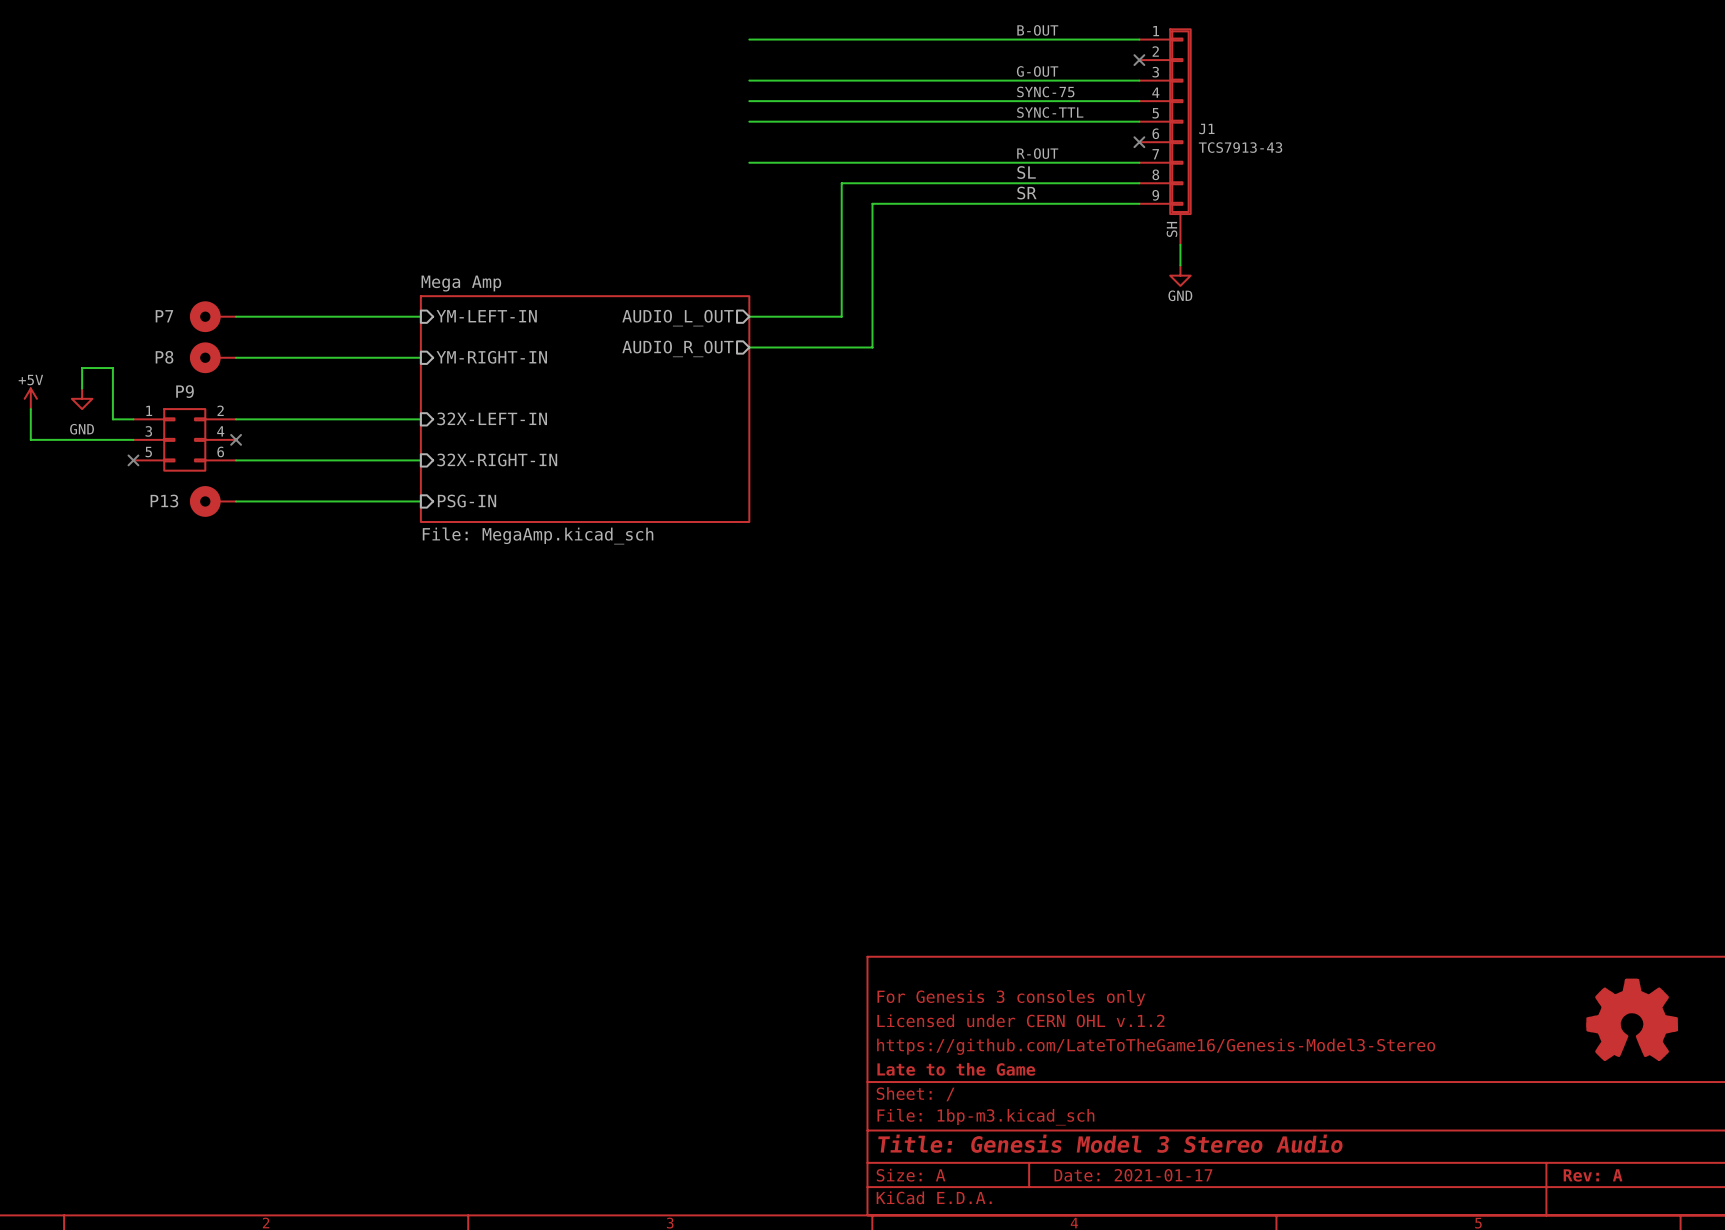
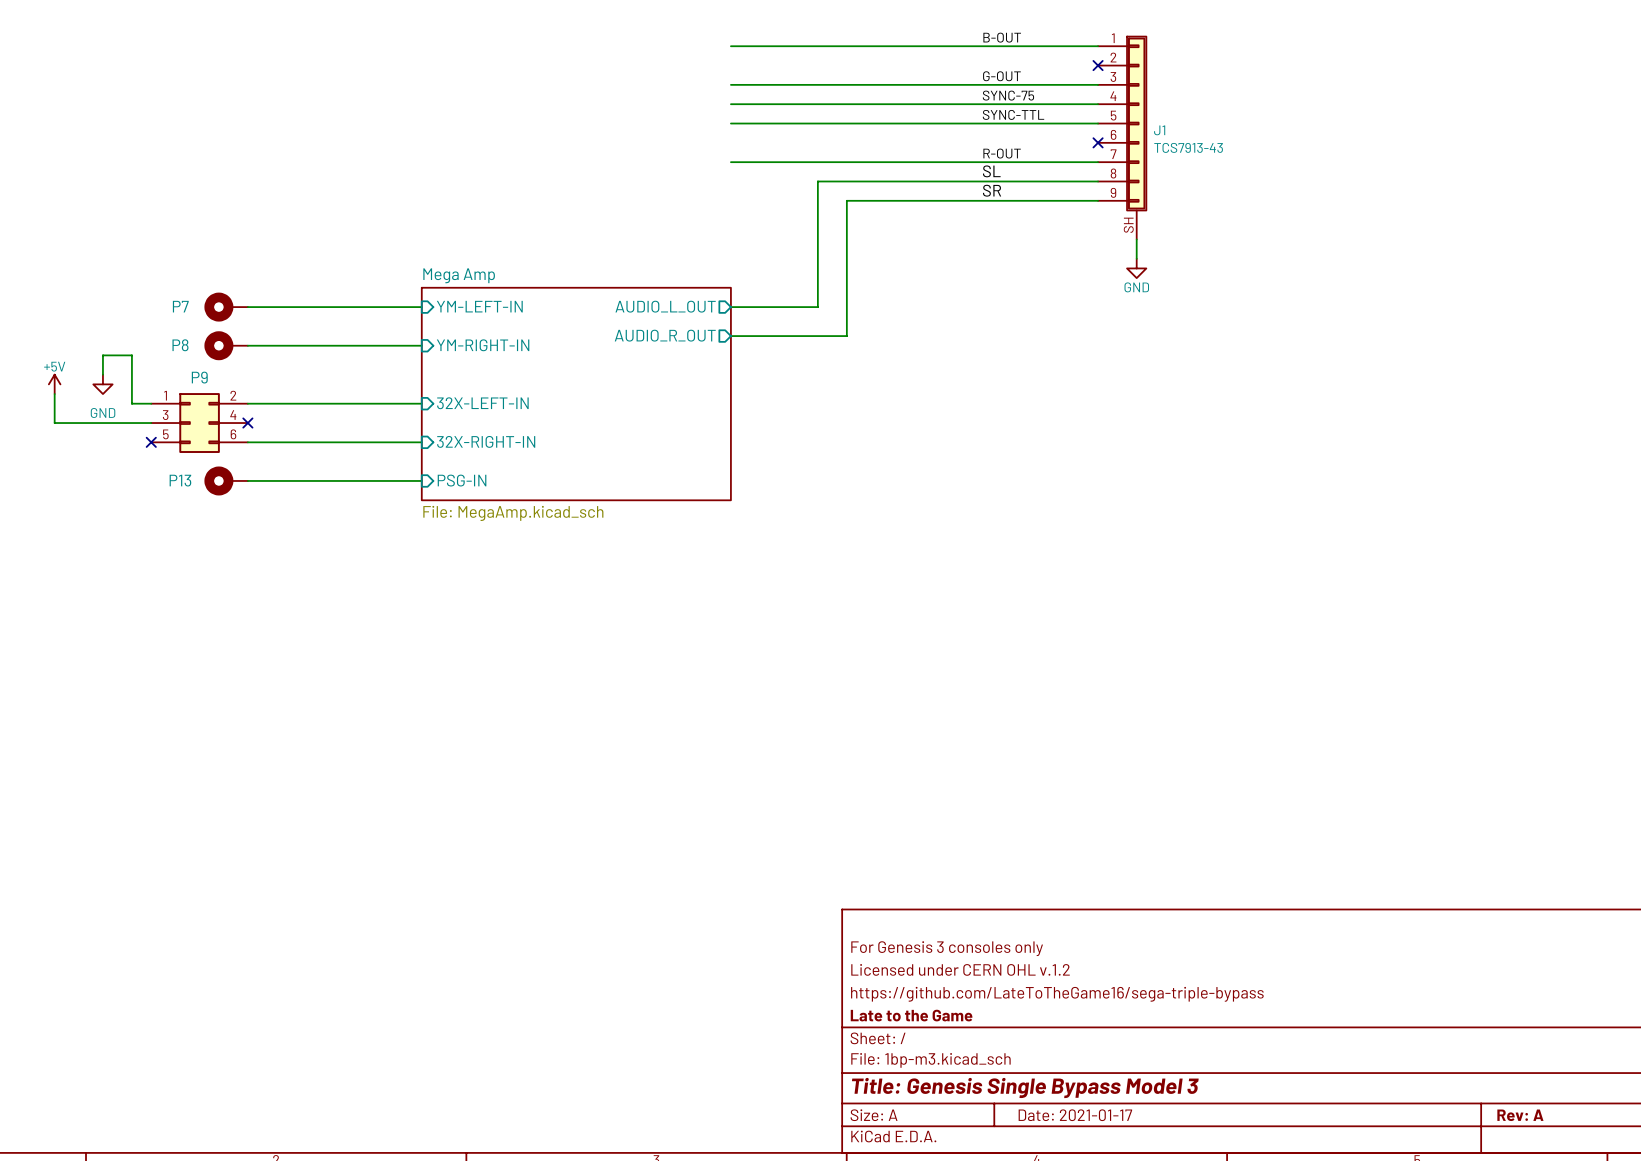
part: (1632, 1019) -> none
title block: https://github.com/LateToTheGame16/Genesis-Model3-Stereo (1156, 1046) -> https://github.com/LateToTheGame16/sega-triple-bypass (1057, 994)
title block: Title: Genesis Model 3 Stereo Audio (1110, 1143) -> Title: Genesis Single Bypass Model 3 (1025, 1088)

